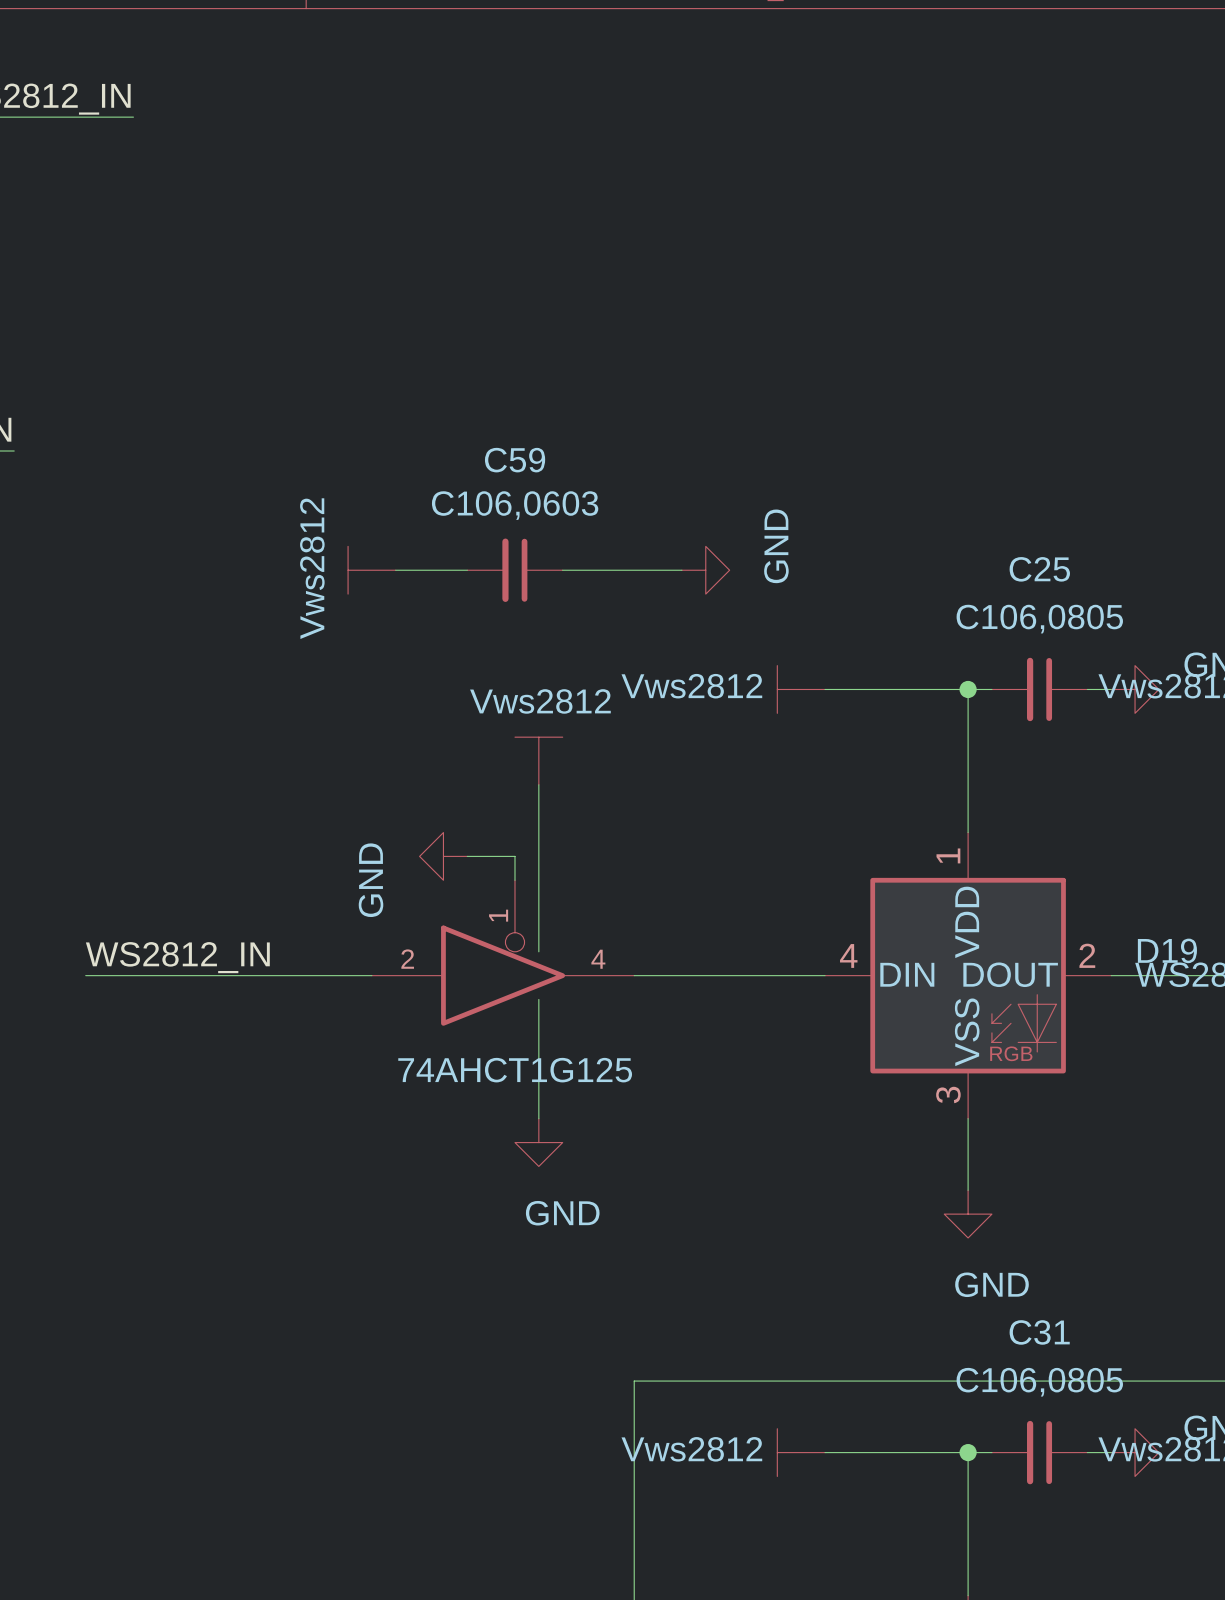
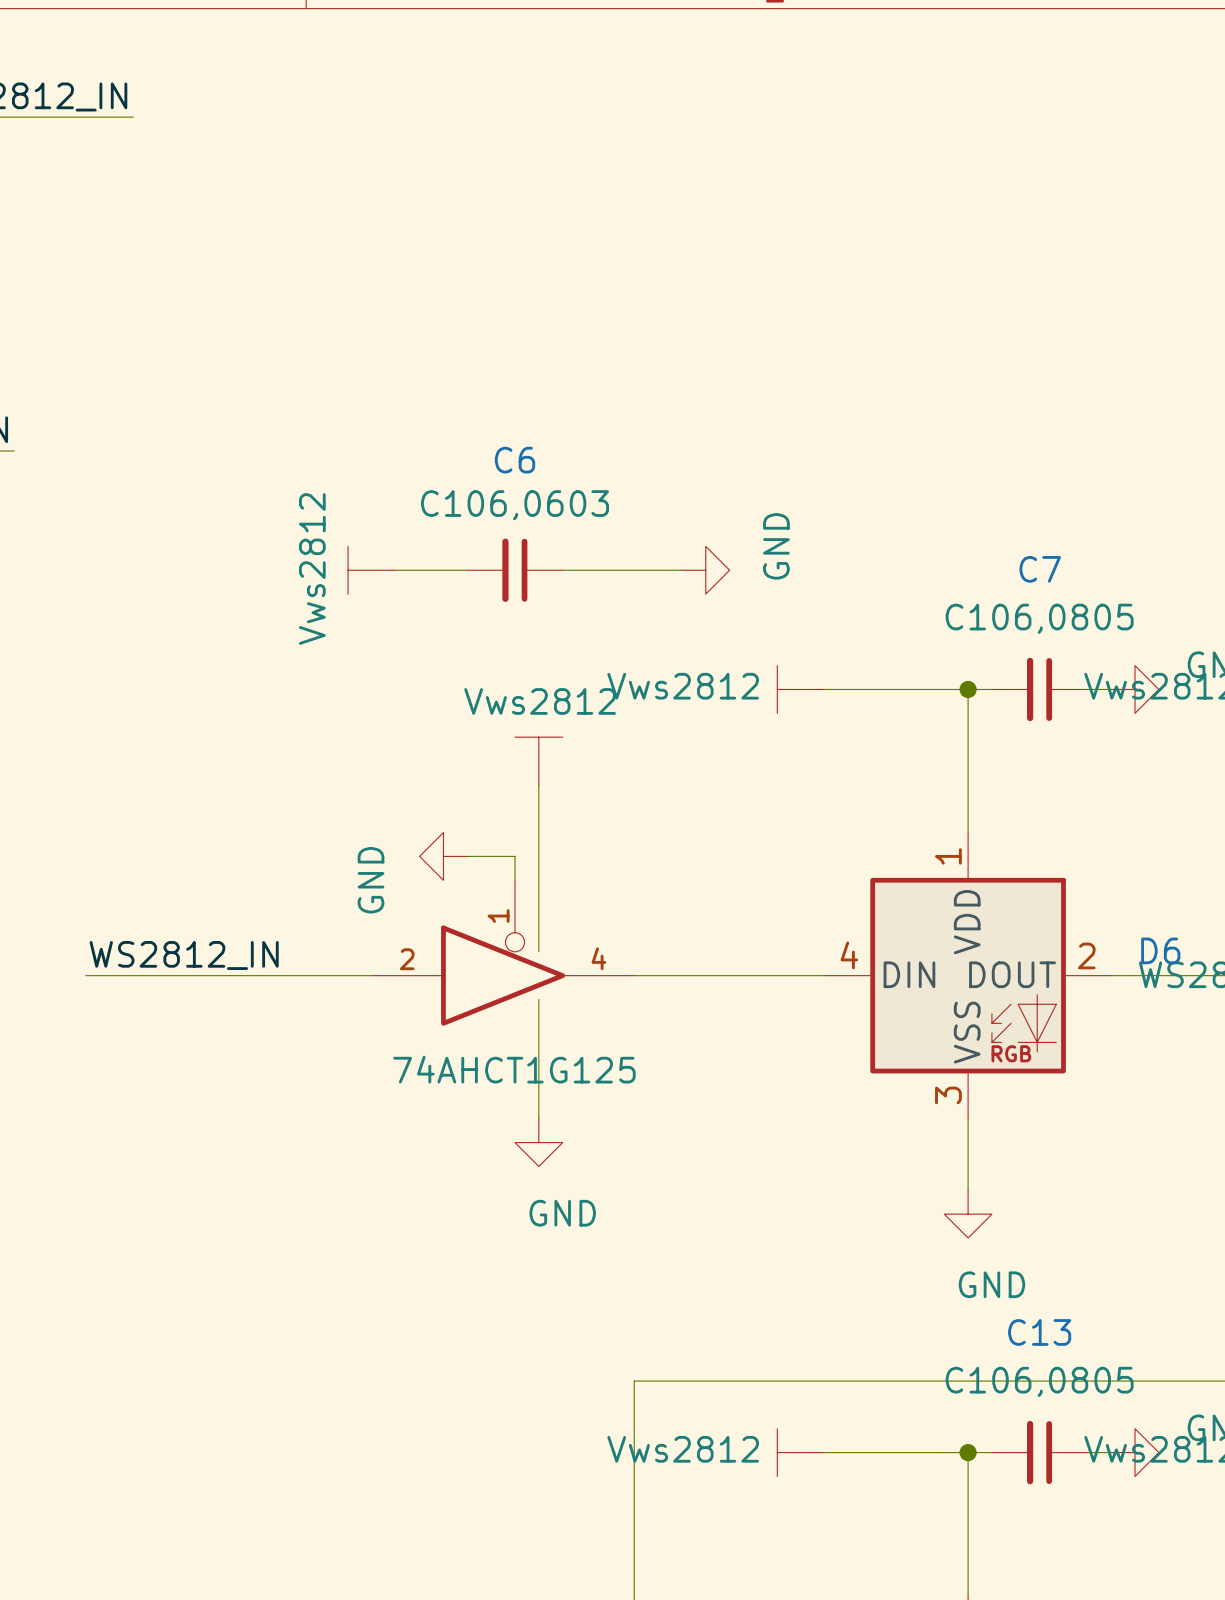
C59 name: C59 (515, 460) -> C6 (514, 460)
C25 name: C25 (1039, 569) -> C7 (1040, 569)
D19 name: D19 (1167, 950) -> D6 (1160, 950)
C31 name: C31 (1039, 1332) -> C13 (1039, 1332)

